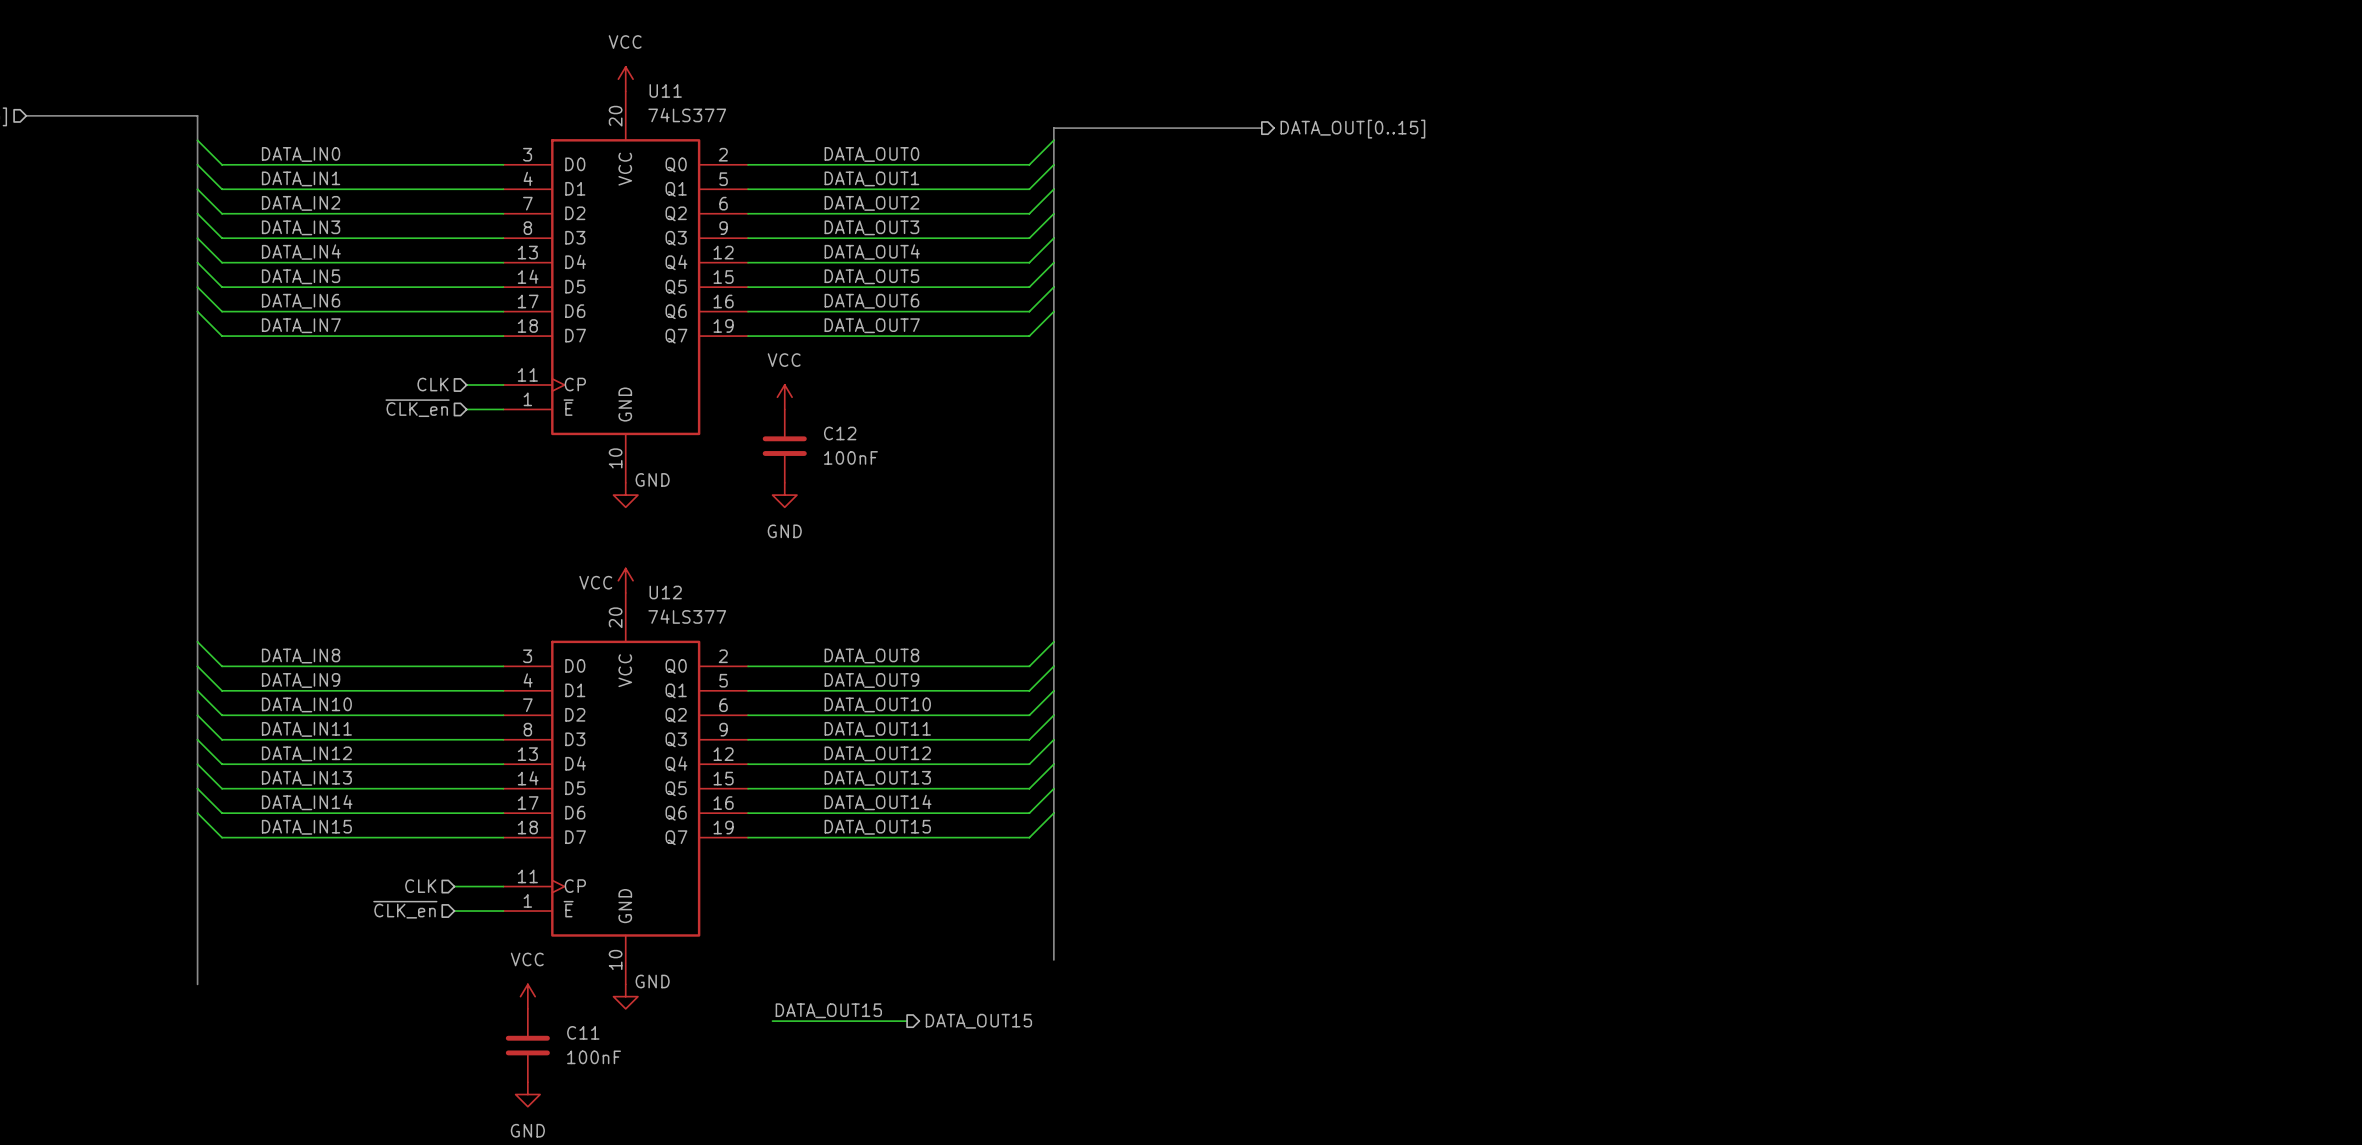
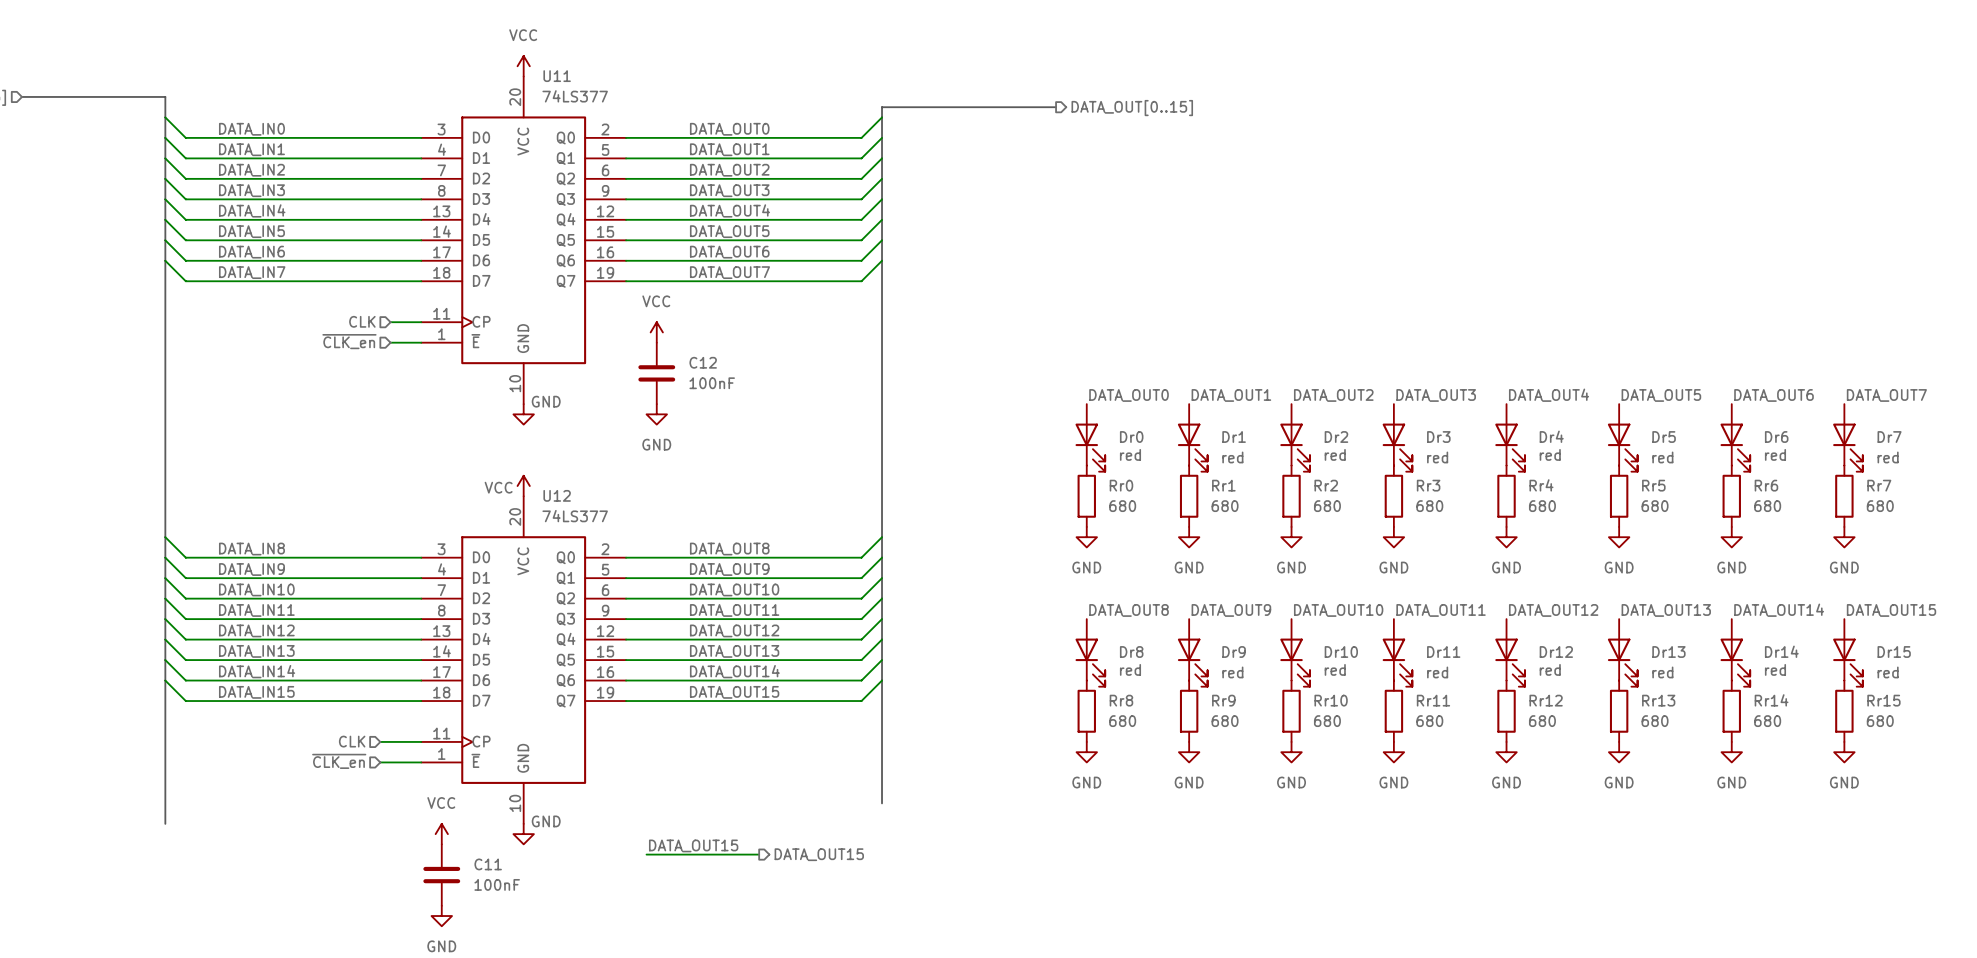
label: none -> DATA_OUT0 (1129, 395)
label: none -> DATA_OUT1 (1231, 395)
label: none -> DATA_OUT2 (1333, 395)
label: none -> DATA_OUT3 (1436, 395)
label: none -> DATA_OUT4 (1549, 395)
label: none -> DATA_OUT5 (1661, 395)
label: none -> DATA_OUT6 (1774, 395)
label: none -> DATA_OUT7 (1886, 395)
Dr0: none -> red (1090, 437)
Dr1: none -> red (1192, 437)
Dr2: none -> red (1295, 437)
Dr3: none -> red (1397, 437)
Dr4: none -> red (1510, 437)
Dr5: none -> red (1622, 437)
Dr6: none -> red (1735, 437)
Dr7: none -> red (1847, 437)
Rr0: none -> 680 (1086, 496)
Rr1: none -> 680 (1189, 496)
Rr2: none -> 680 (1291, 496)
Rr3: none -> 680 (1393, 496)
Rr4: none -> 680 (1506, 496)
Rr5: none -> 680 (1619, 496)
Rr6: none -> 680 (1731, 496)
Rr7: none -> 680 (1844, 496)
power symbol: none -> GND (1086, 537)
power symbol: none -> GND (1189, 537)
power symbol: none -> GND (1291, 537)
power symbol: none -> GND (1393, 537)
power symbol: none -> GND (1506, 537)
power symbol: none -> GND (1619, 537)
power symbol: none -> GND (1731, 537)
power symbol: none -> GND (1844, 537)
label: none -> DATA_OUT8 (1129, 610)
label: none -> DATA_OUT9 (1231, 610)
label: none -> DATA_OUT10 (1338, 610)
label: none -> DATA_OUT11 (1441, 610)
label: none -> DATA_OUT12 (1553, 610)
label: none -> DATA_OUT13 (1666, 610)
label: none -> DATA_OUT14 (1779, 610)
label: none -> DATA_OUT15 (1891, 610)
Dr8: none -> red (1090, 652)
Dr9: none -> red (1192, 652)
Dr10: none -> red (1295, 652)
Dr11: none -> red (1397, 652)
Dr12: none -> red (1510, 652)
Dr13: none -> red (1622, 652)
Dr14: none -> red (1735, 652)
Dr15: none -> red (1847, 652)
Rr8: none -> 680 (1086, 711)
Rr9: none -> 680 (1189, 711)
Rr10: none -> 680 (1291, 711)
Rr11: none -> 680 (1393, 711)
Rr12: none -> 680 (1506, 711)
Rr13: none -> 680 (1619, 711)
Rr14: none -> 680 (1731, 711)
Rr15: none -> 680 (1844, 711)
power symbol: none -> GND (1086, 752)
power symbol: none -> GND (1189, 752)
power symbol: none -> GND (1291, 752)
power symbol: none -> GND (1393, 752)
power symbol: none -> GND (1506, 752)
power symbol: none -> GND (1619, 752)
power symbol: none -> GND (1731, 752)
power symbol: none -> GND (1844, 752)

